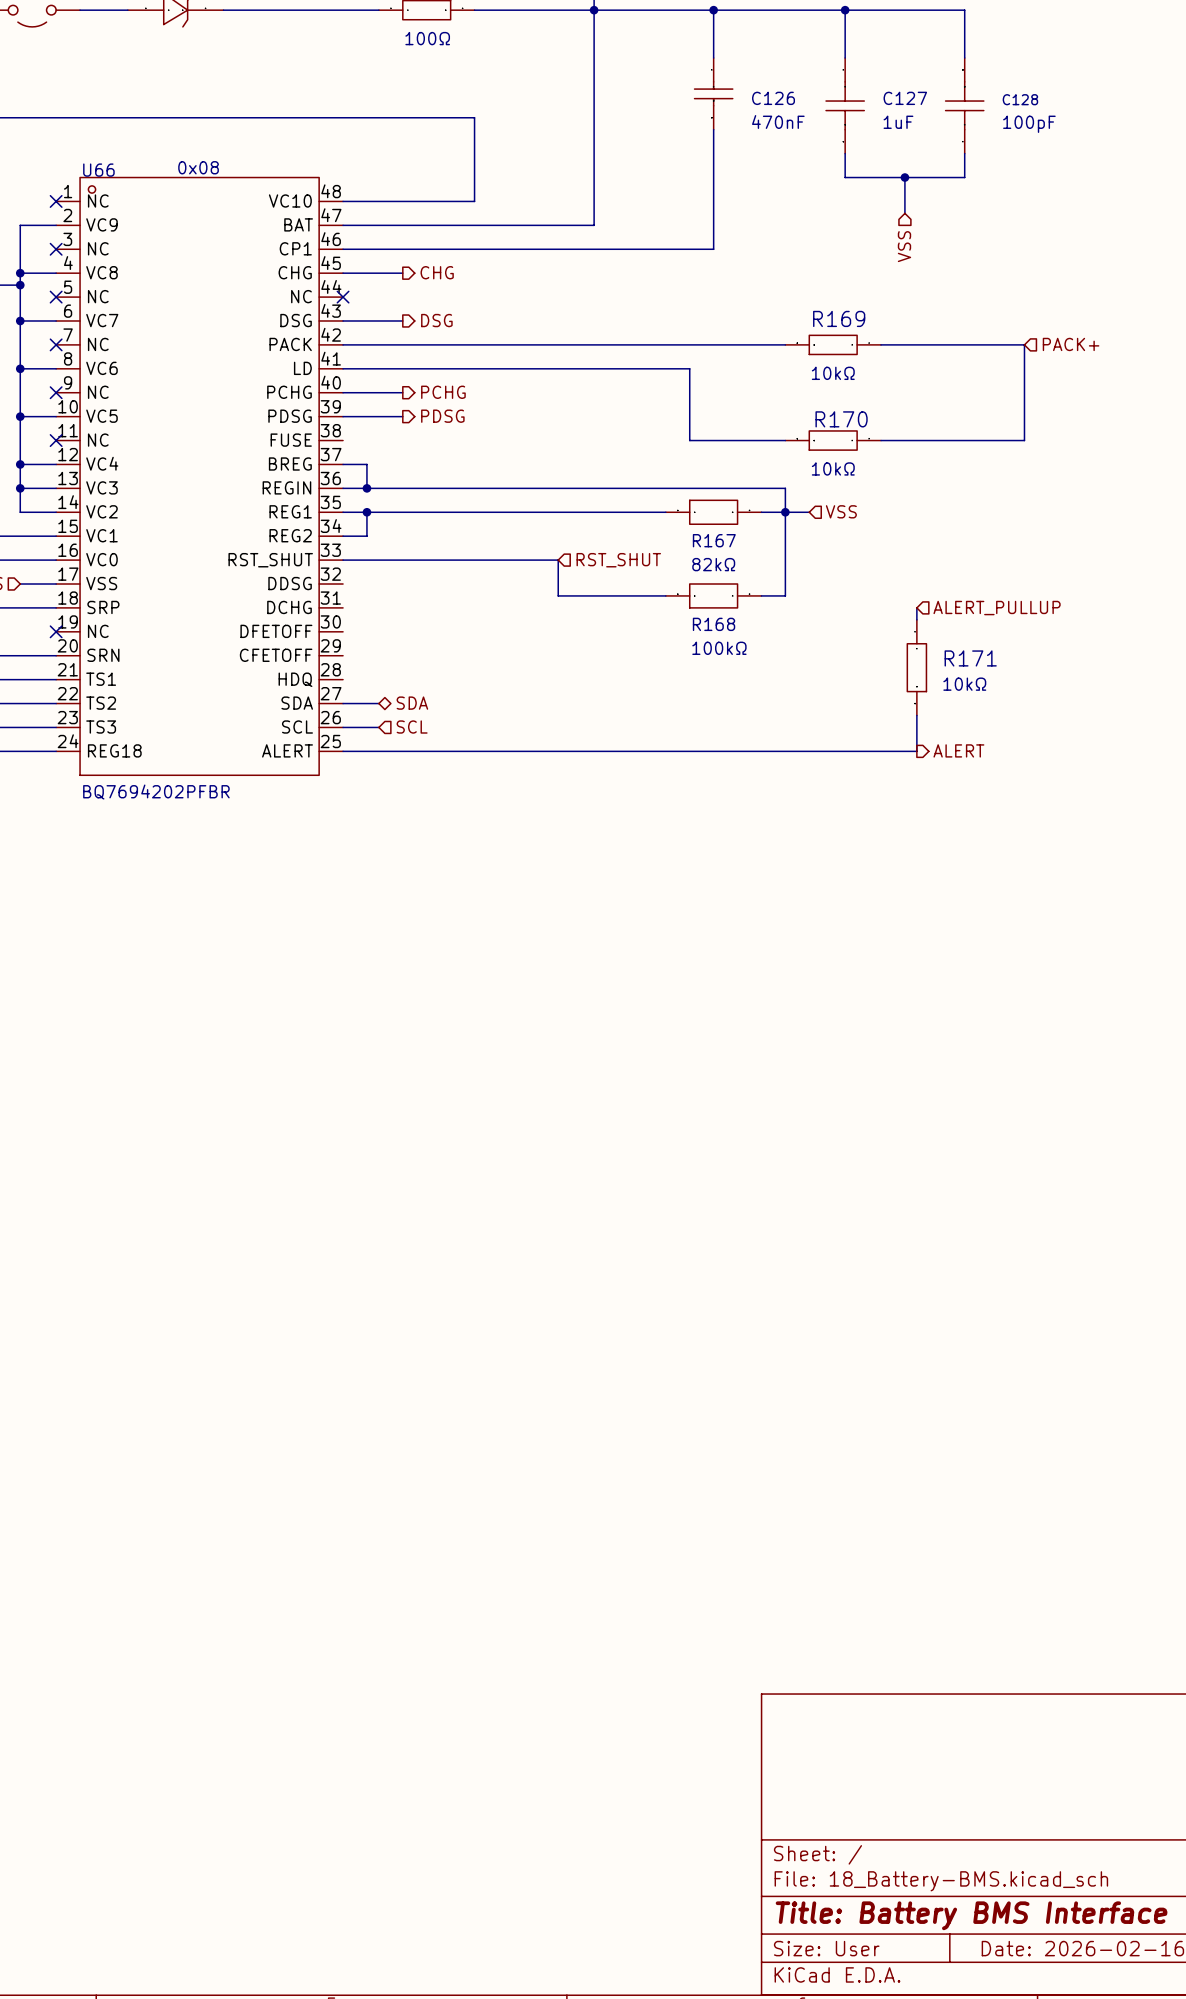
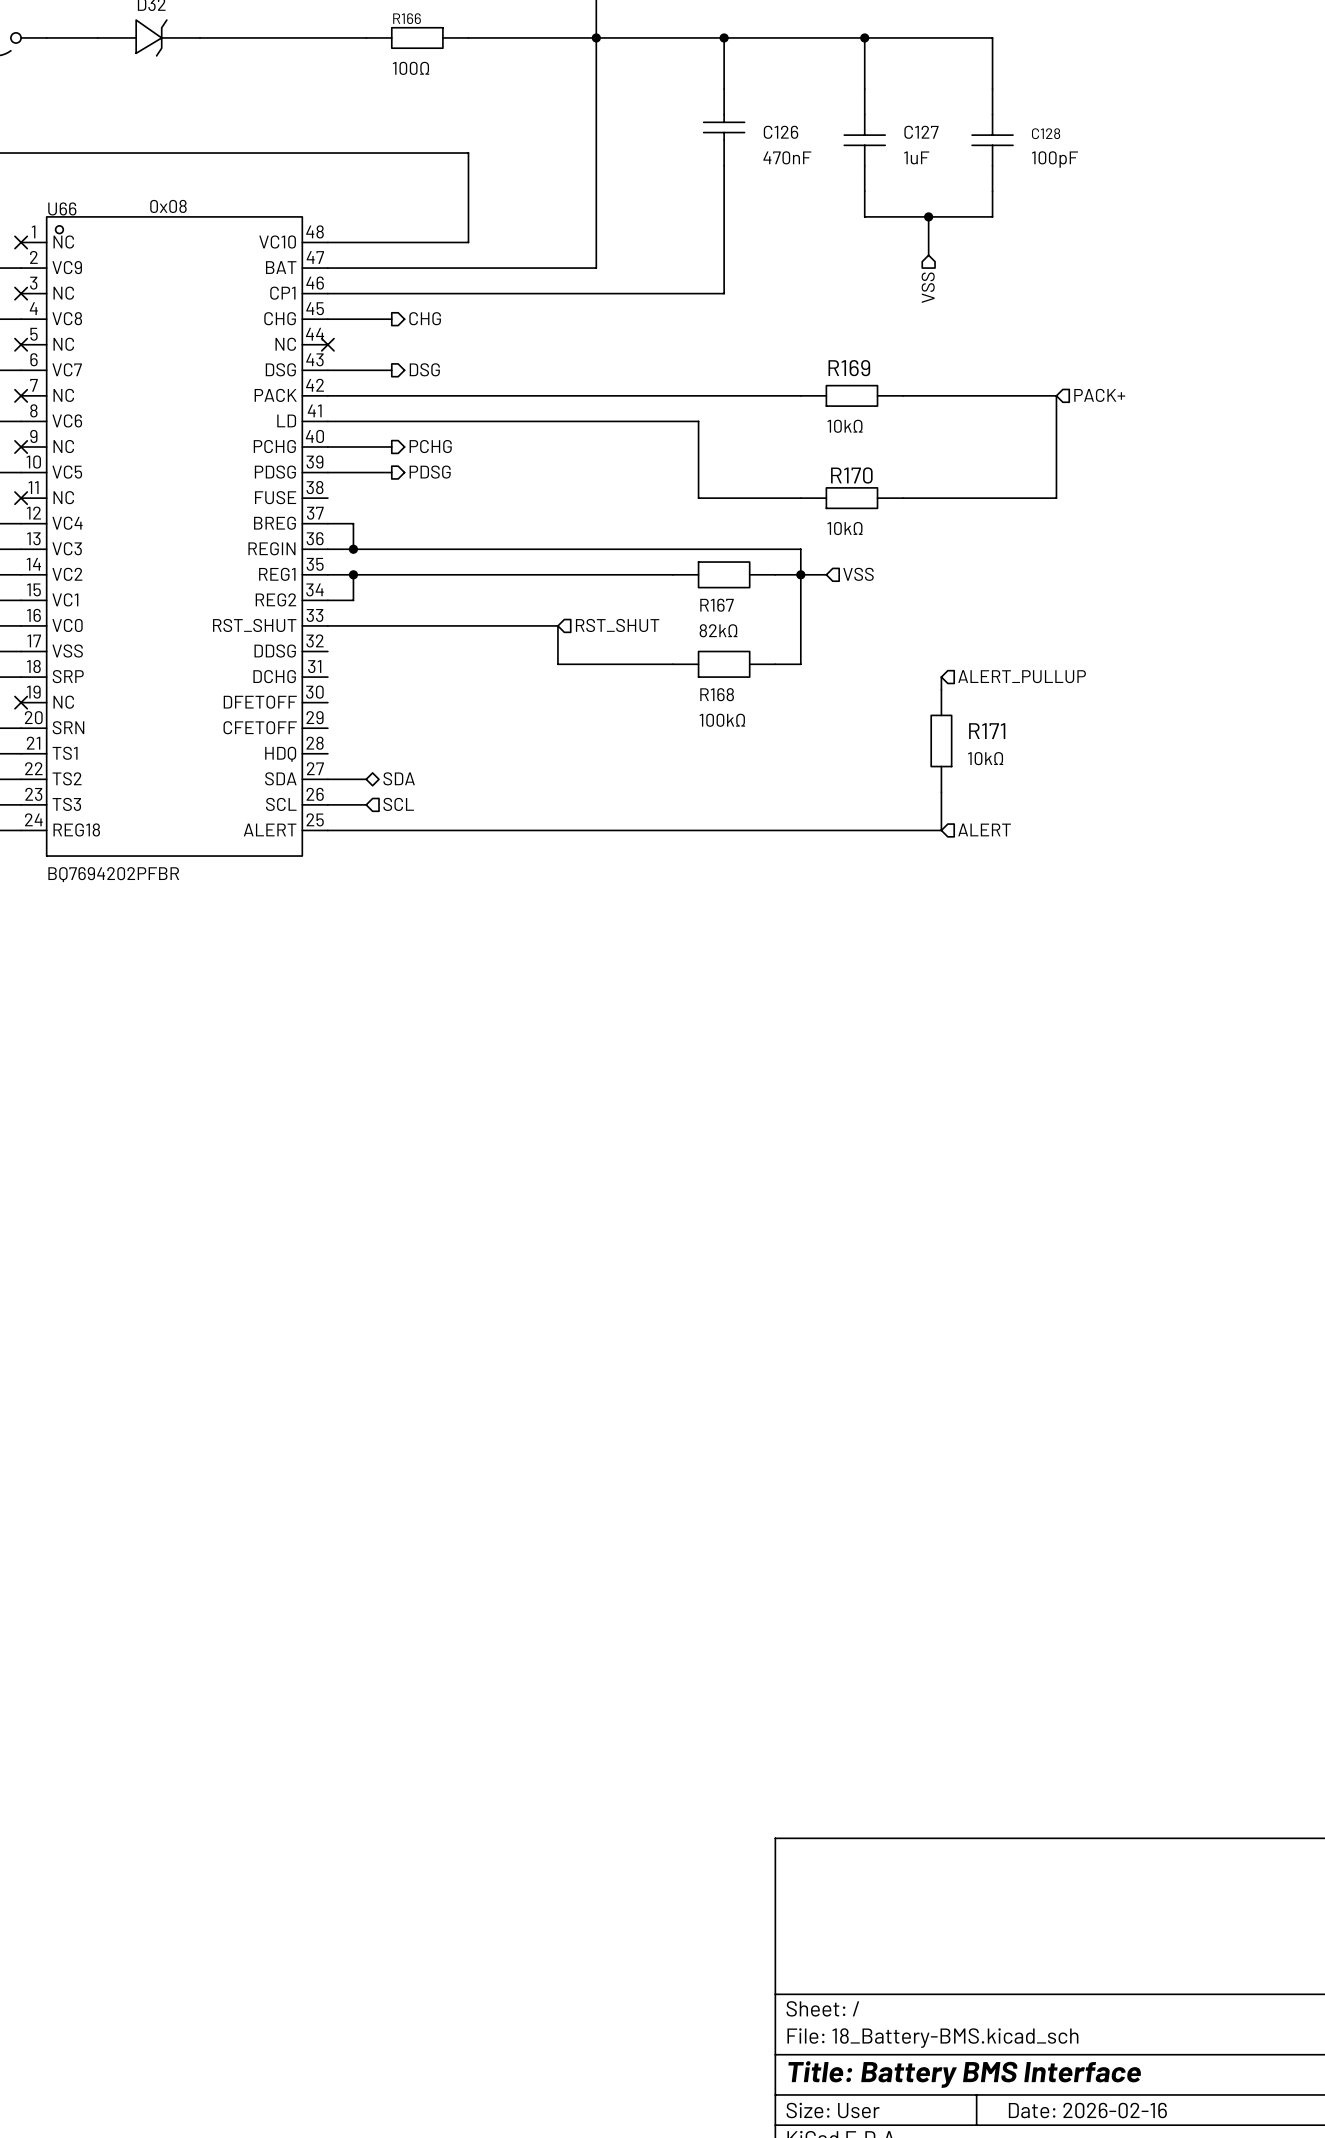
hierarchical label shape: output (958, 750) -> input (984, 829)

